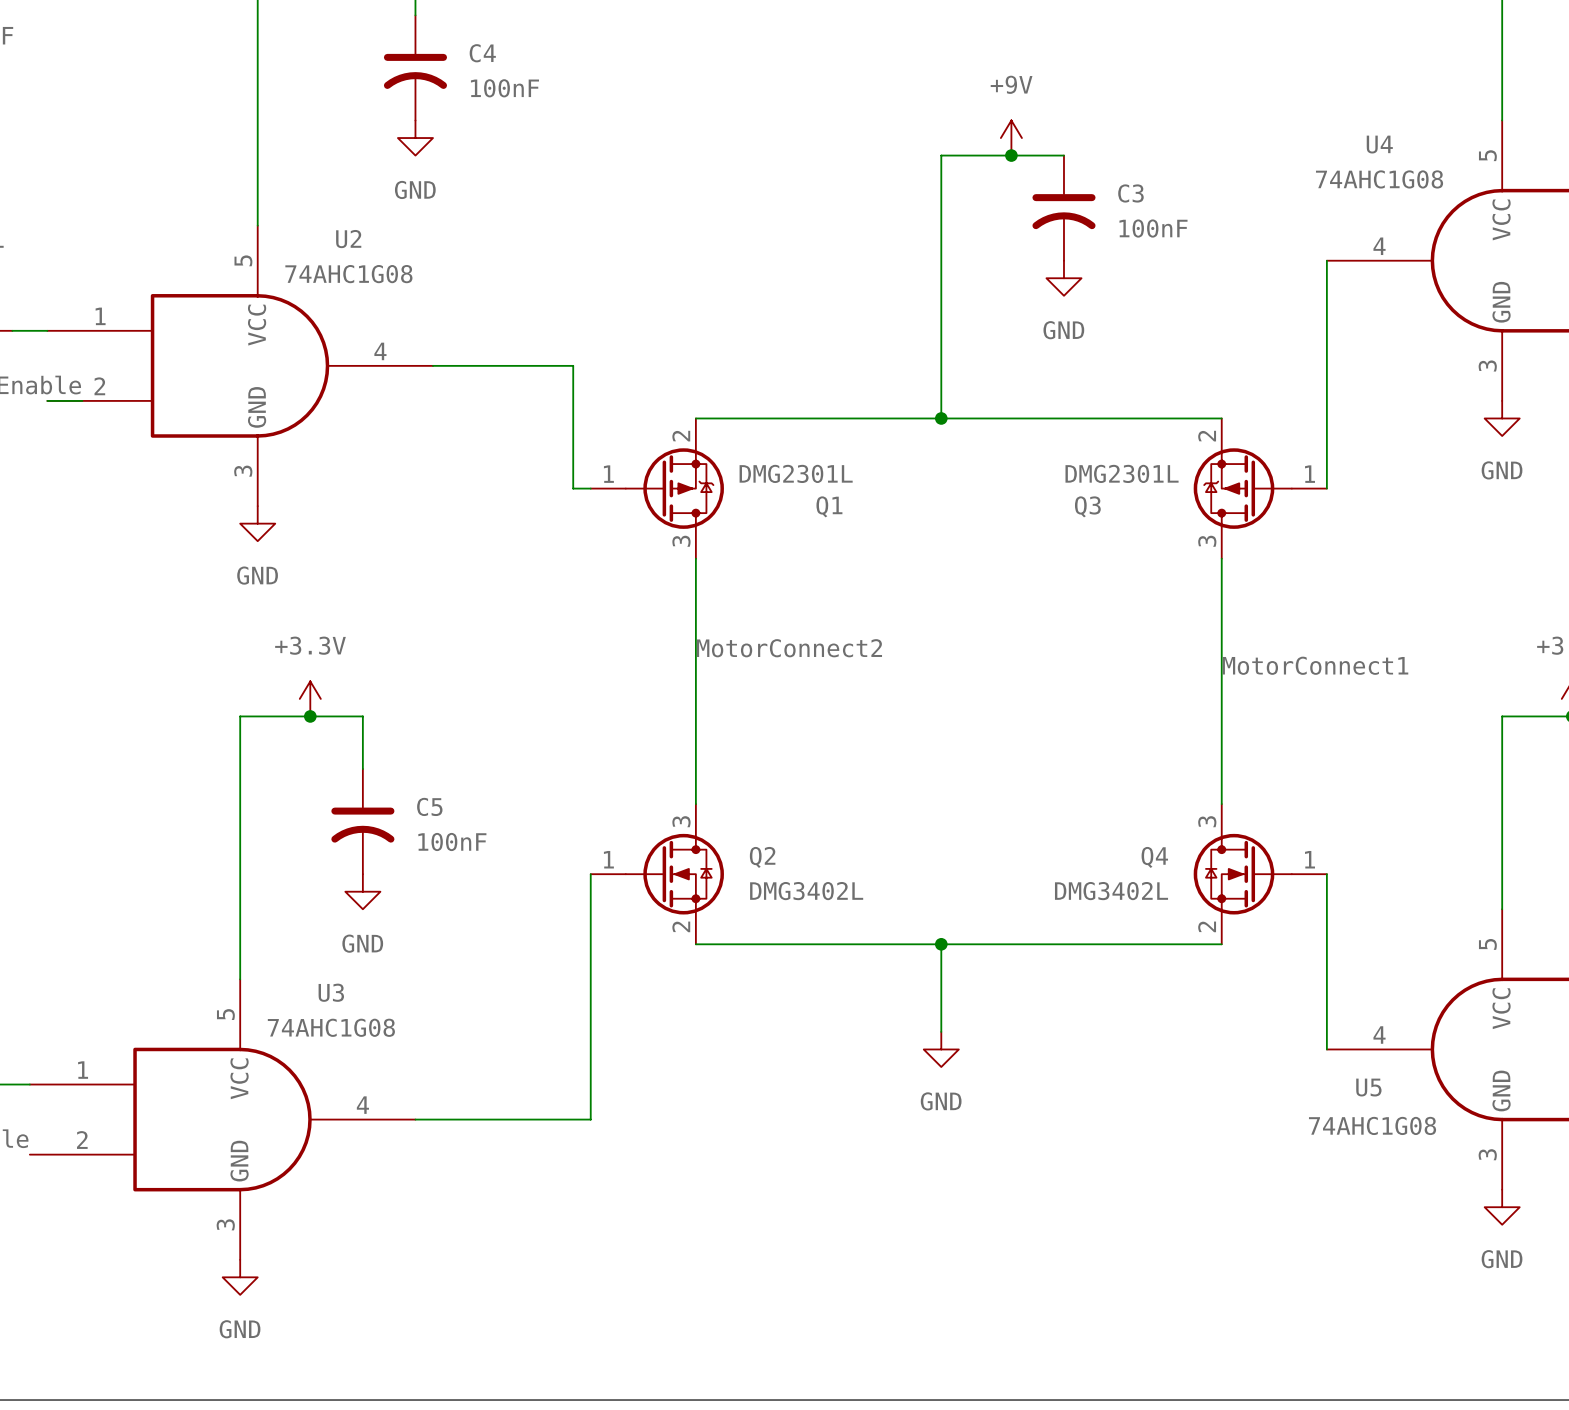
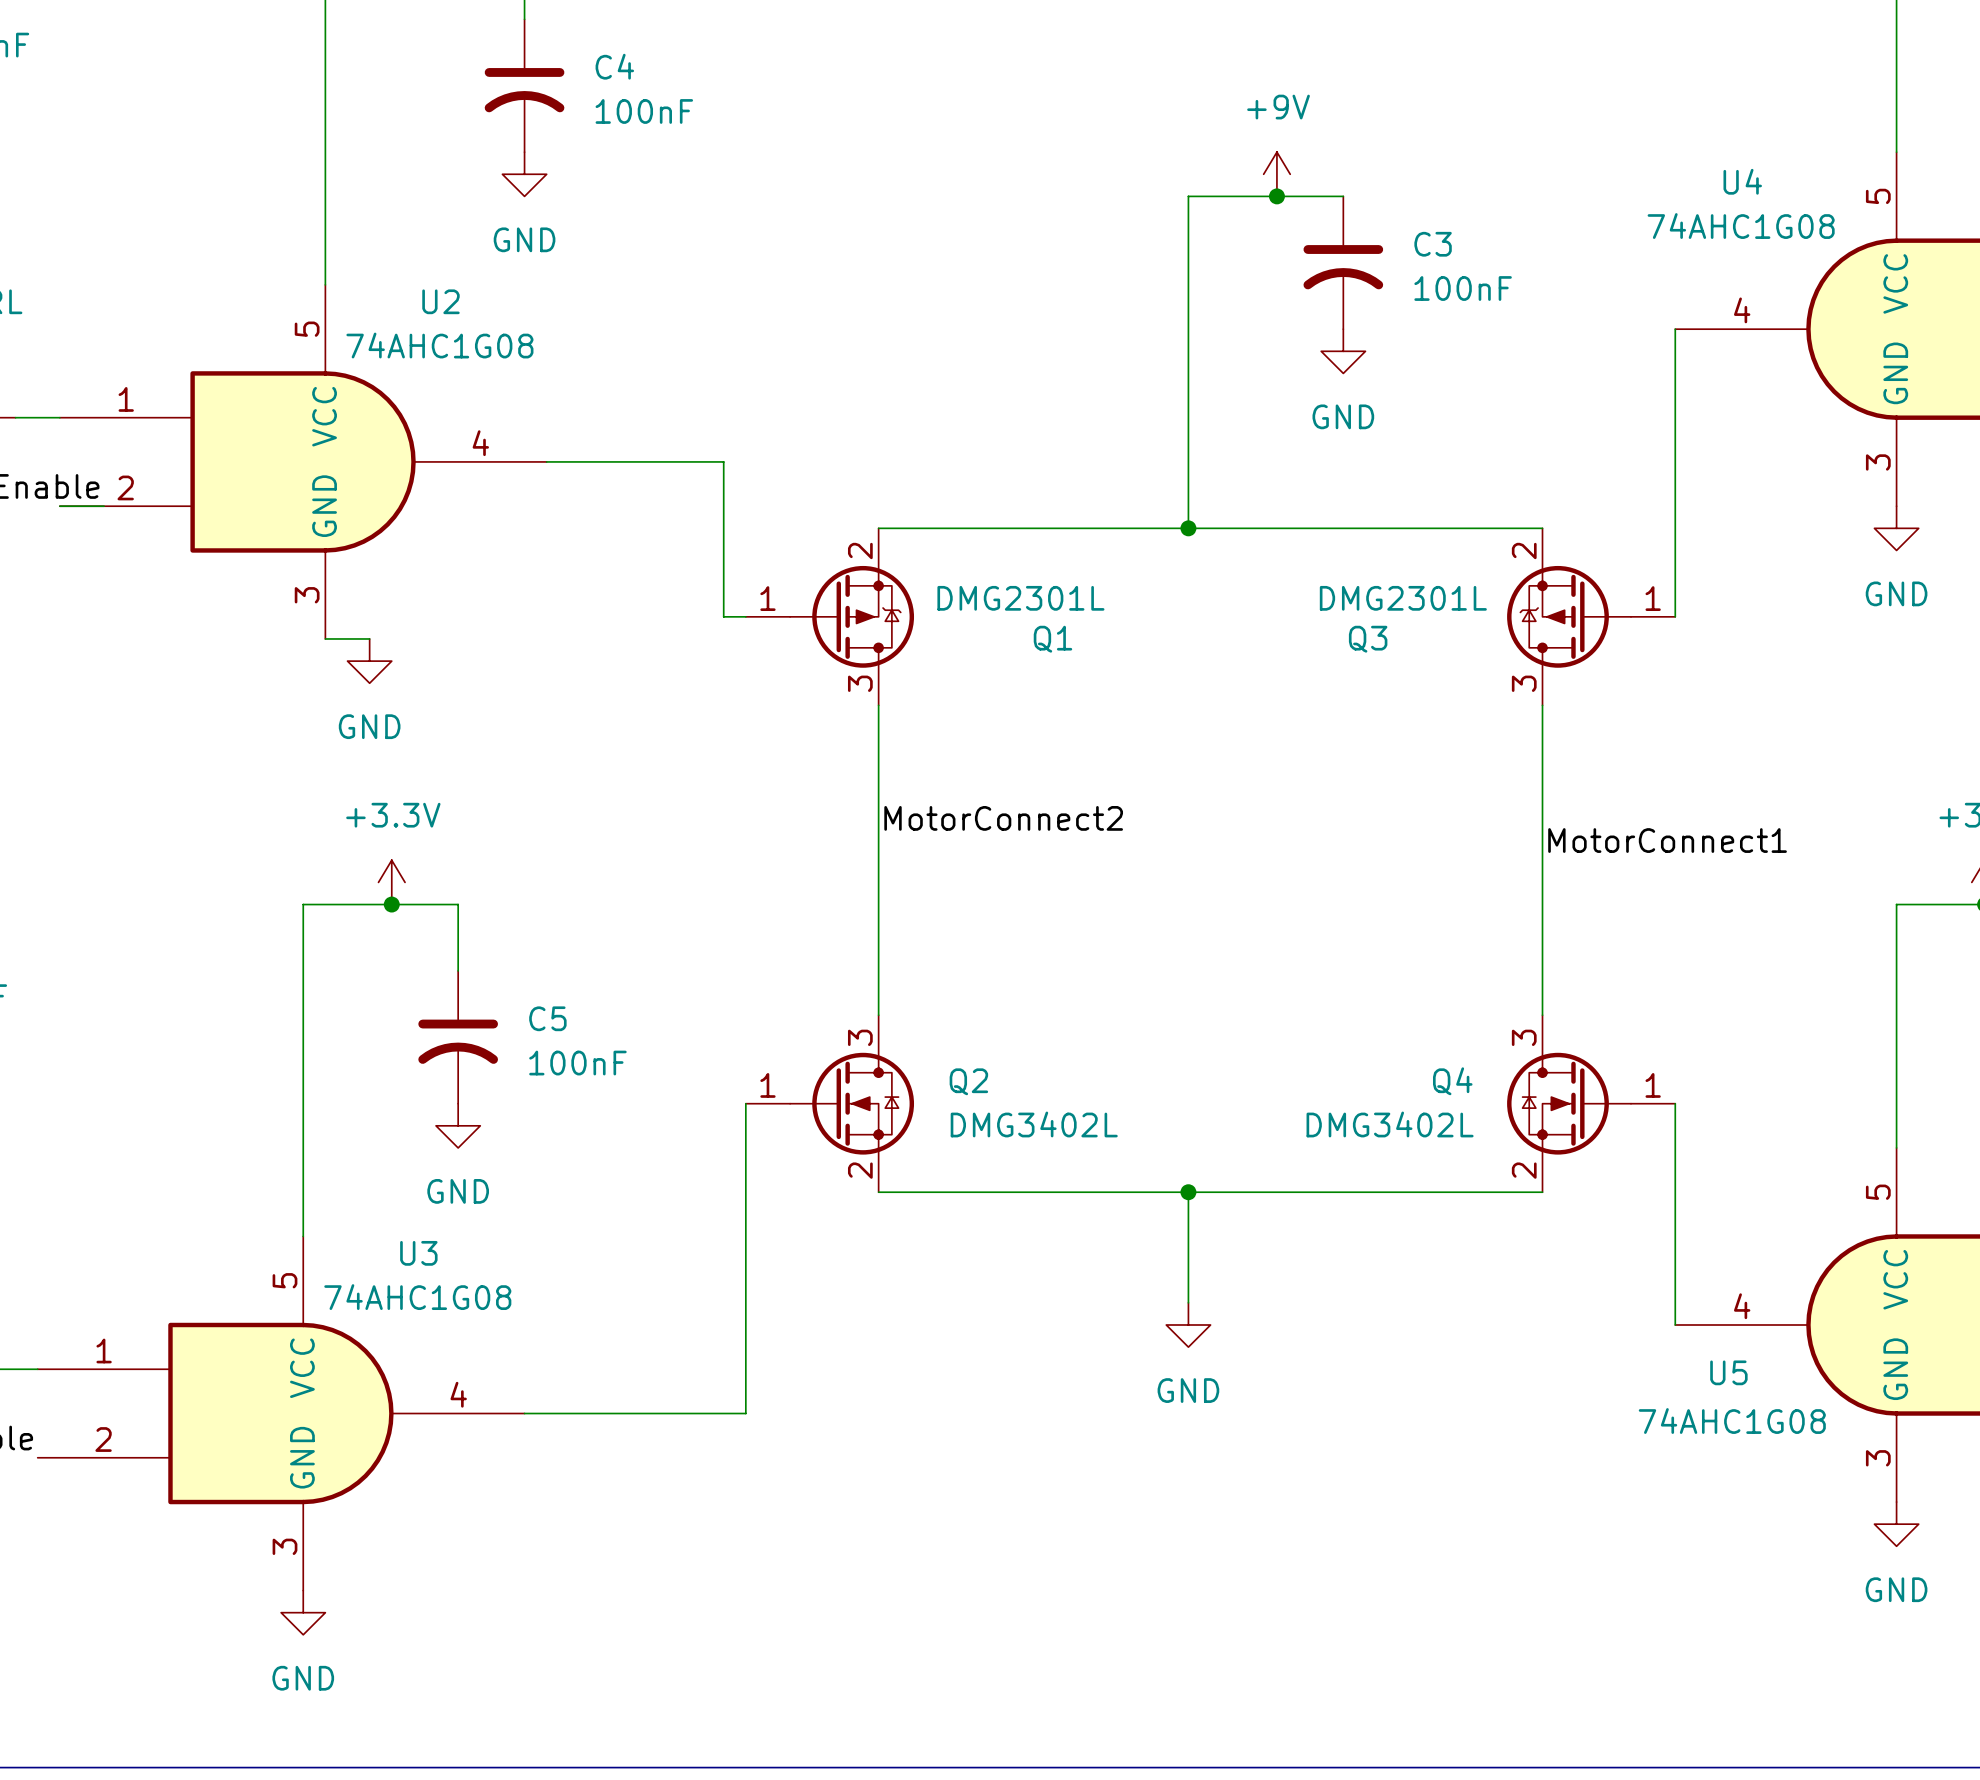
wire: none -> (325, 638) (369, 638)
power symbol position: GND (257, 523) -> GND (369, 661)

